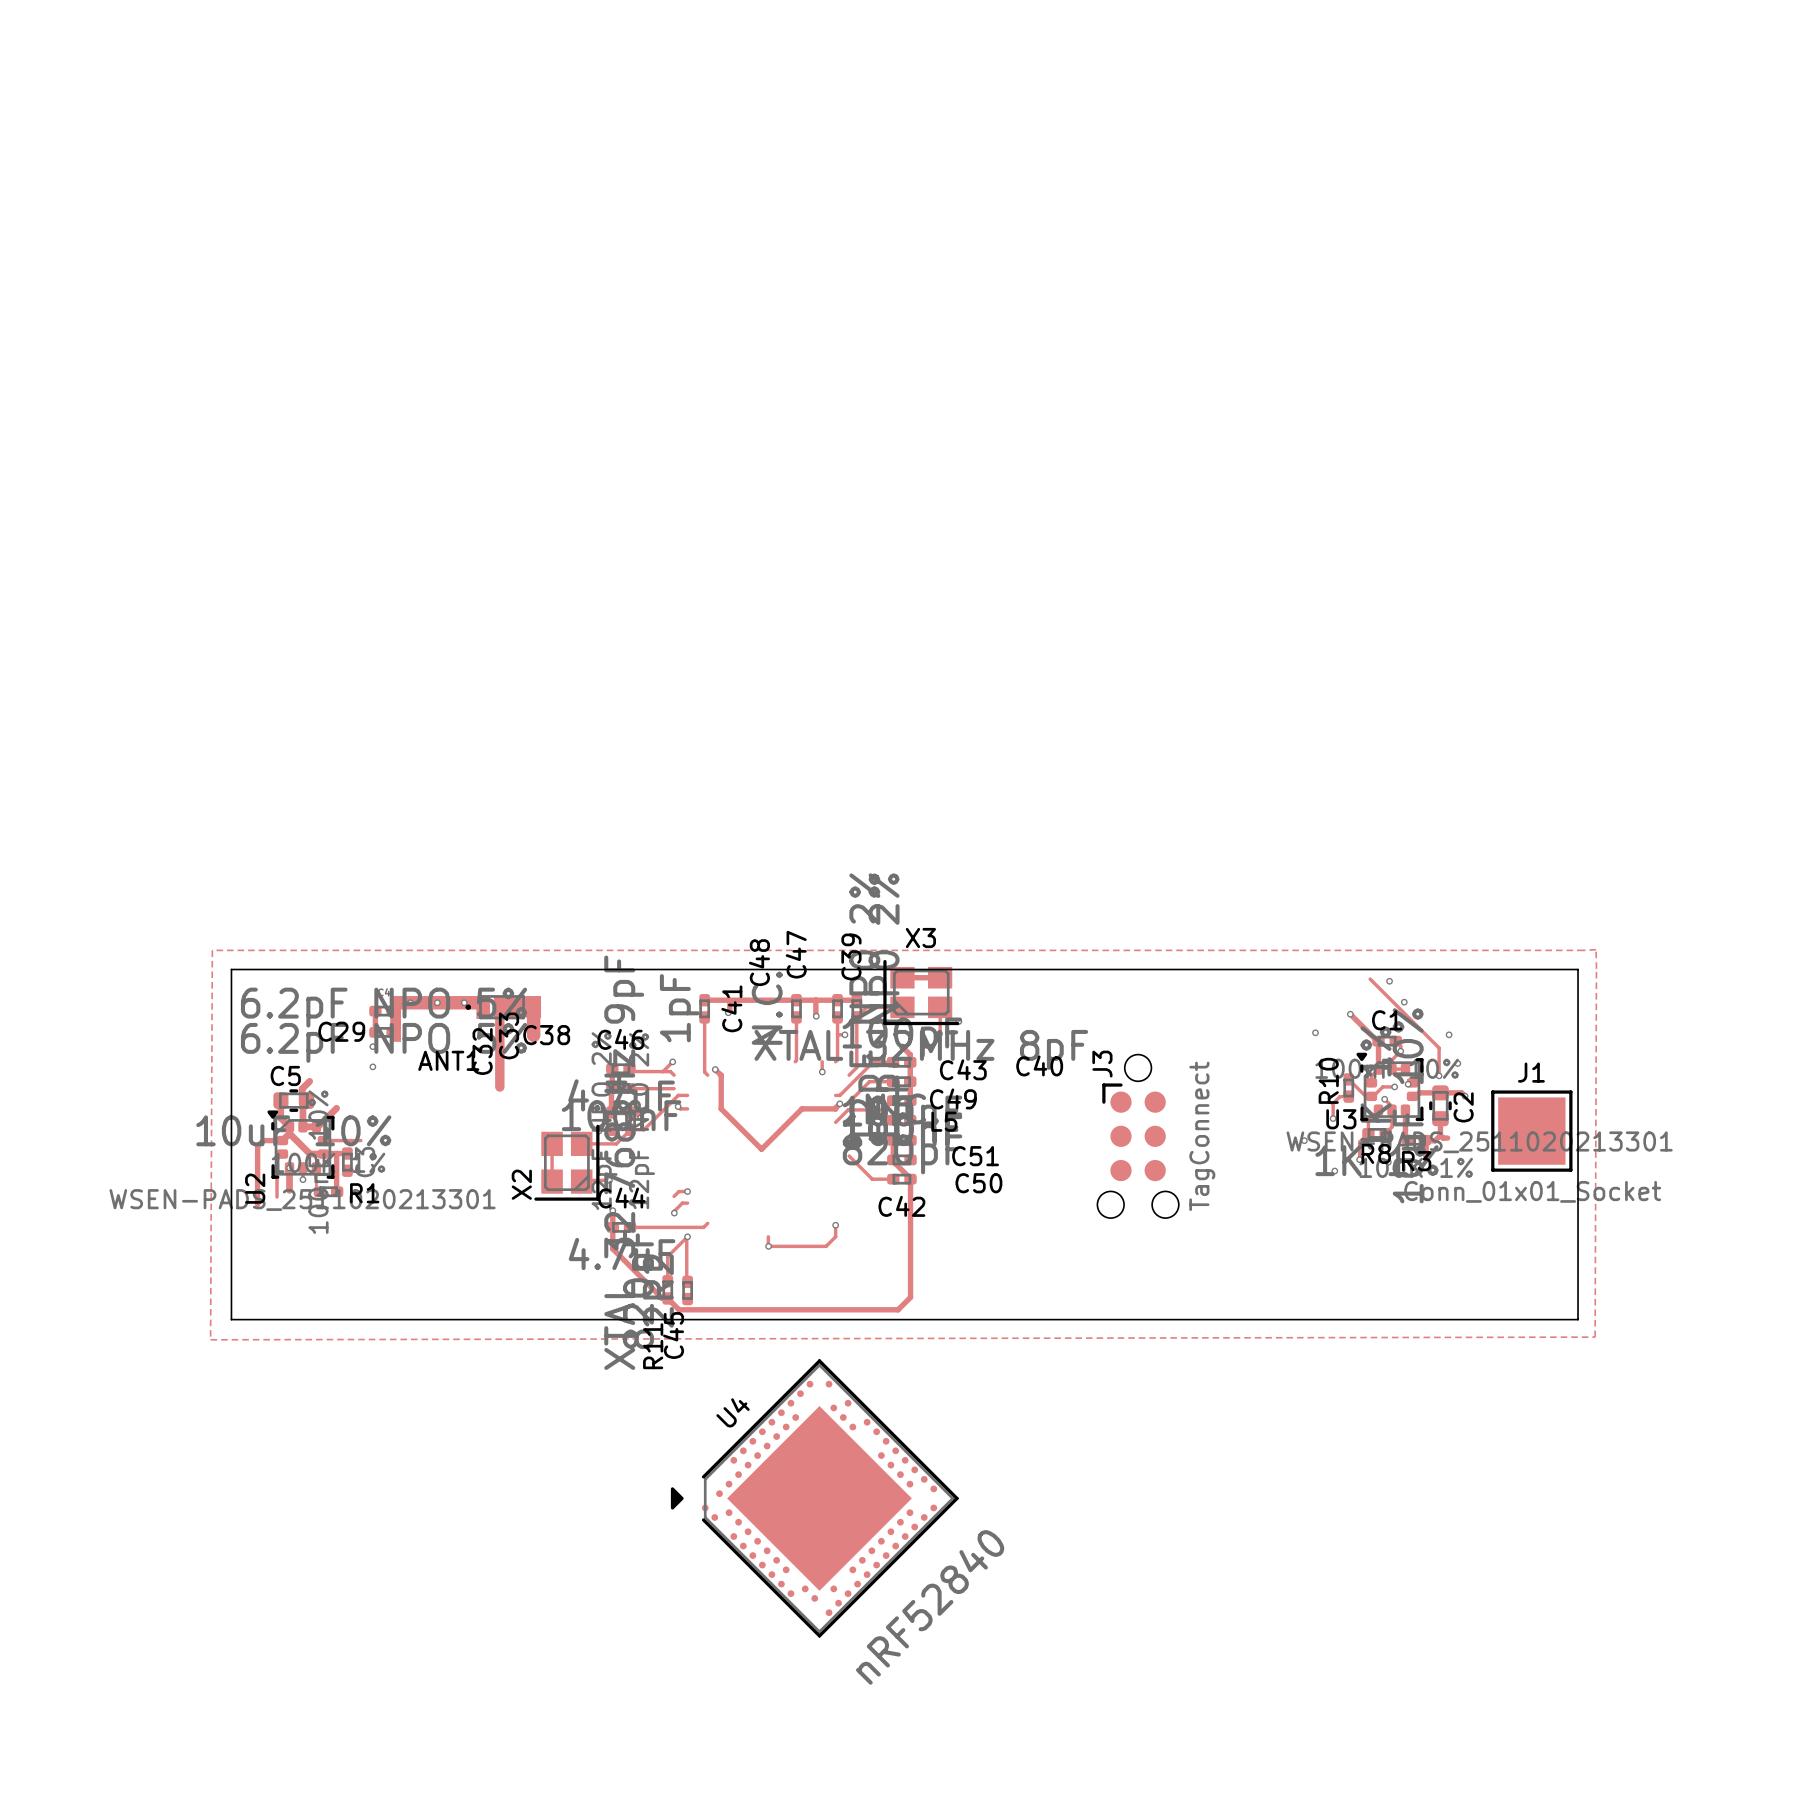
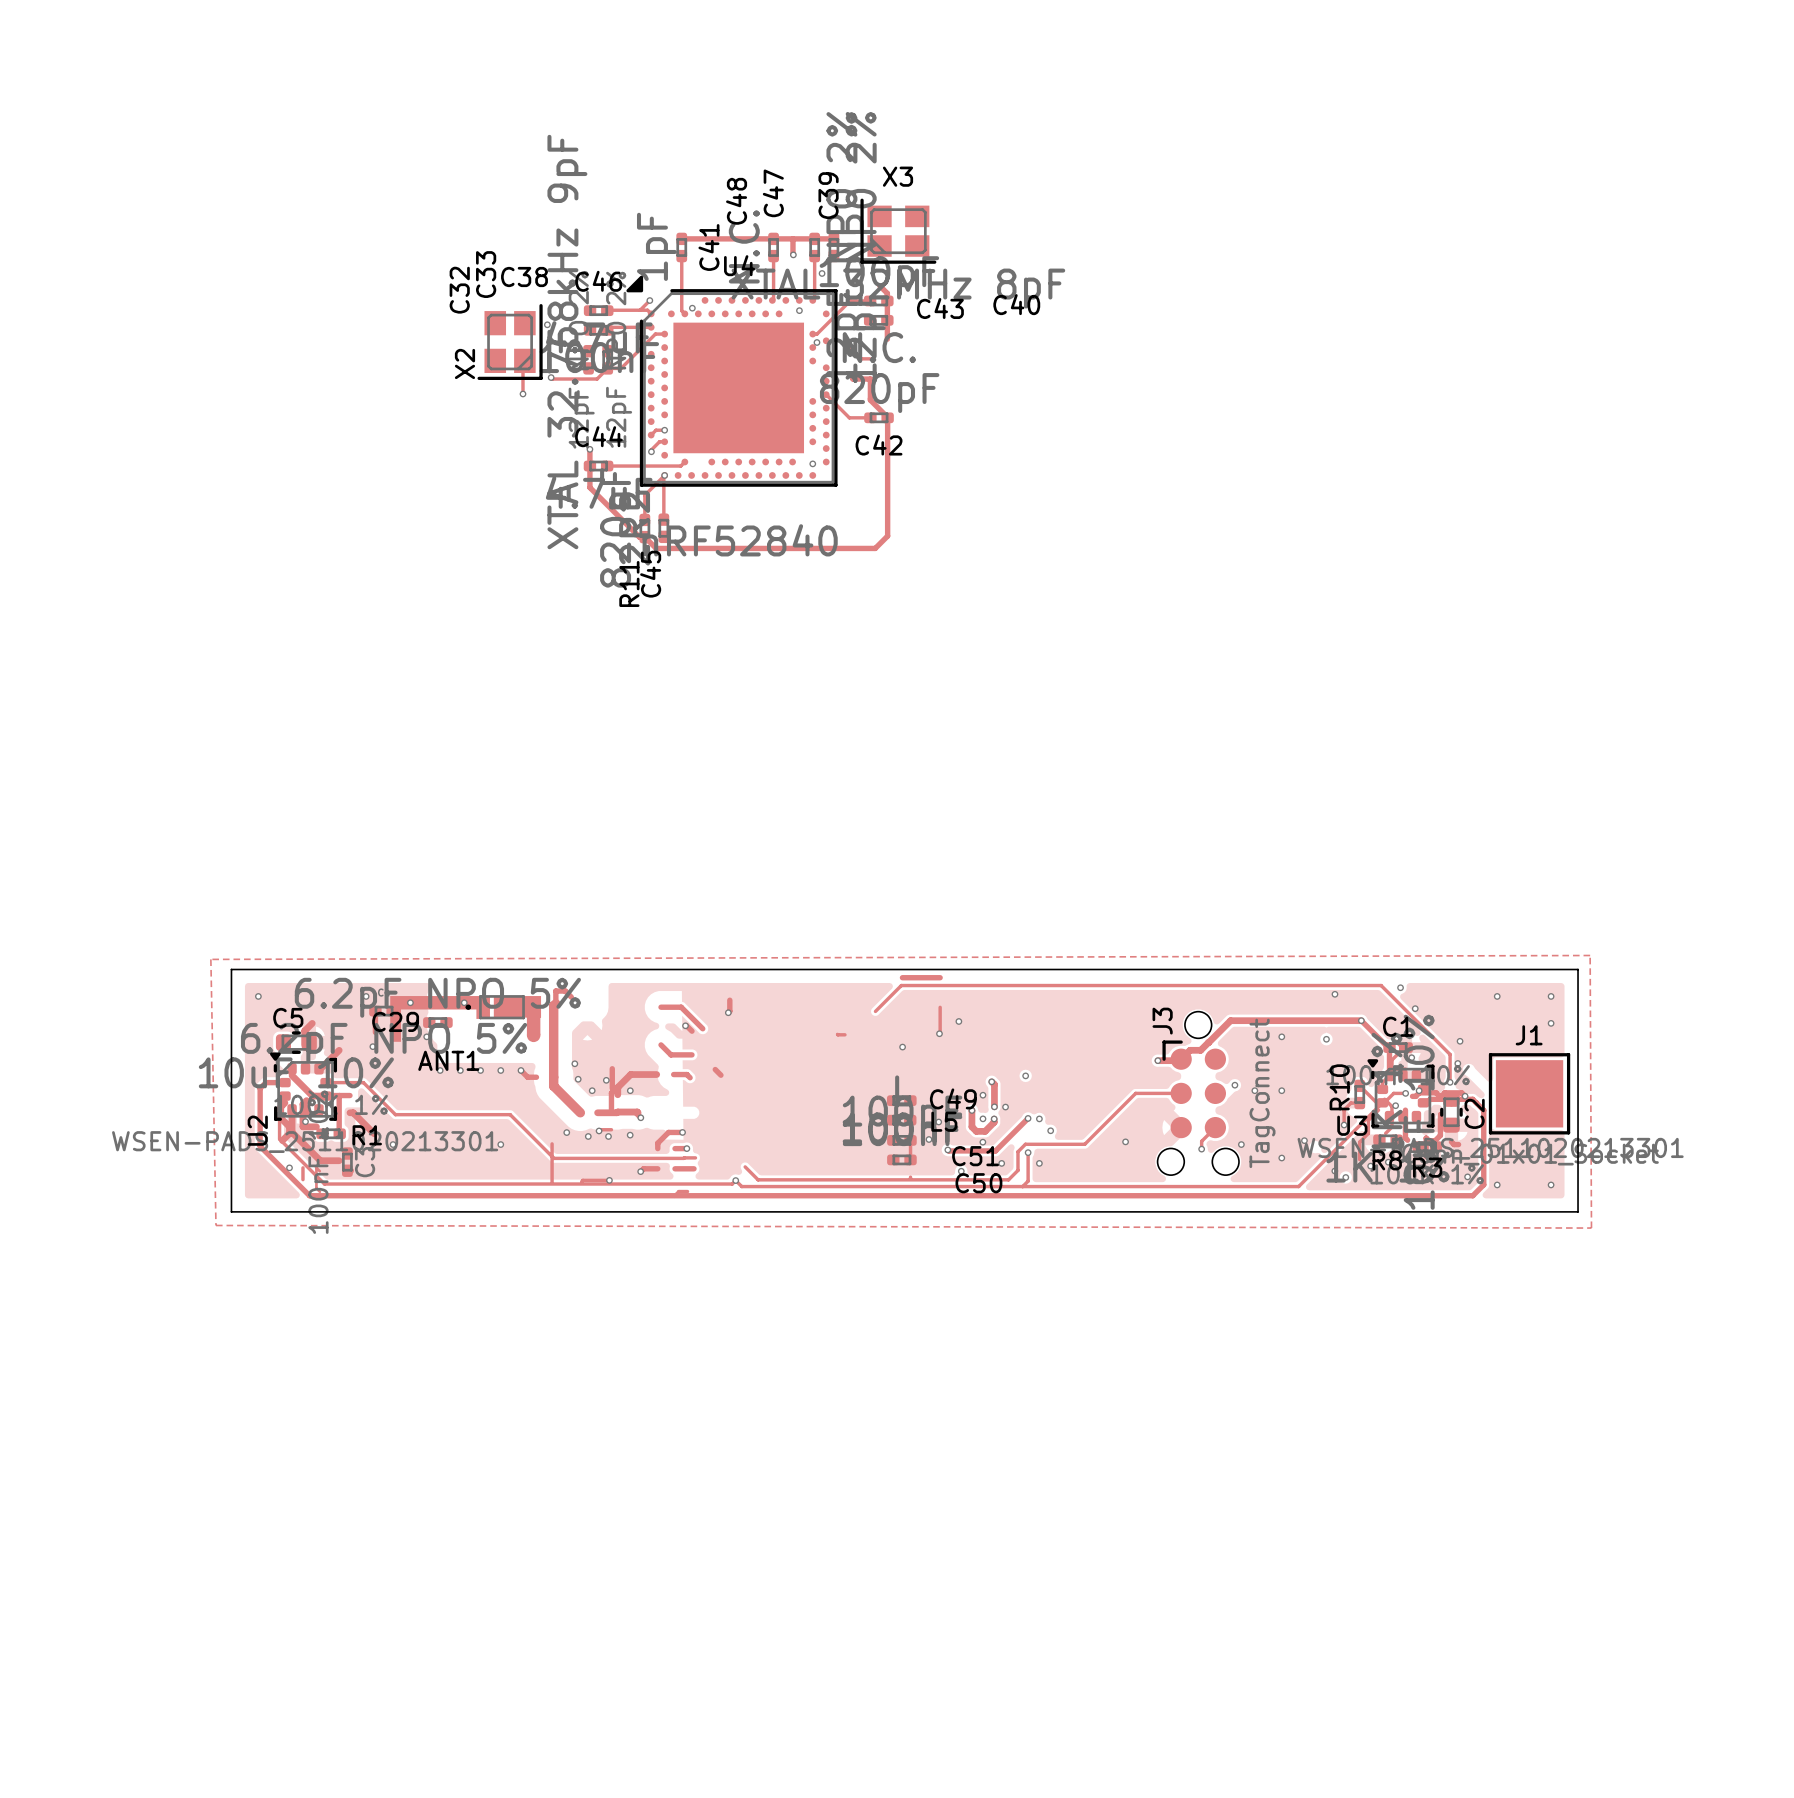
track: none -> (681, 238) (833, 238)
track: none -> (792, 238) (793, 254)
via: none -> (793, 254)
track: none -> (681, 256) (681, 310) (684, 313)
track: none -> (773, 256) (772, 300)
track: none -> (814, 256) (814, 298) (812, 300)
via: none -> (822, 273)
track: none -> (879, 285) (887, 293) (887, 339)
track: none -> (649, 300) (640, 310)
via: none -> (649, 300)
track: none -> (870, 300) (850, 300) (817, 334) (812, 334)
via: none -> (692, 308)
track: none -> (607, 310) (647, 310) (651, 313)
via: none -> (799, 310)
via: none -> (547, 324)
track: none -> (651, 327) (610, 327) (607, 330)
track: none -> (664, 334) (655, 334) (621, 368) (607, 368) (597, 379) (551, 377)
via: none -> (816, 342)
track: none -> (851, 348) (861, 358) (870, 358)
track: none -> (522, 370) (522, 393)
via: none -> (551, 377)
track: none -> (852, 378) (870, 379) (870, 400) (887, 417) (887, 536) (875, 548) (656, 548) (644, 537) (639, 537) (589, 487) (589, 449)
via: none -> (522, 393)
track: none -> (826, 394) (849, 417) (870, 417)
track: none -> (664, 430) (656, 430) (651, 435)
via: none -> (664, 430)
track: none -> (664, 441) (659, 441) (651, 451)
via: none -> (589, 449)
via: none -> (651, 451)
track: none -> (684, 461) (680, 466) (607, 466)
via: none -> (812, 463)
track: none -> (664, 475) (644, 495) (644, 519)
via: none -> (664, 475)
track: none -> (663, 476) (663, 519)
zone outline: (1596, 949) (1595, 1337) (210, 1339) (212, 950) (1596, 949) -> (1590, 955) (210, 959) (215, 1225) (1591, 1228) (1590, 955)
track: (1370, 979) (1439, 1048) (1439, 1075) -> none
via: (1389, 981) -> none
via: none -> (1400, 987)
X3 position: (921, 992) -> (898, 231)
via: none -> (1334, 994)
via: none -> (258, 996)
via: none -> (366, 996)
via: none -> (1497, 996)
via: none -> (1551, 996)
track: none -> (571, 997) (565, 991) (555, 991) (555, 1003) (553, 1005) (553, 1086) (580, 1112)
track: (704, 1000) (856, 1000) -> none
track: (815, 1000) (816, 1016) -> none
via: (437, 1002) -> none
via: (1404, 1002) -> none
track: (517, 1006) (511, 1000) (501, 1000) (501, 1013) (499, 1015) (499, 1087) -> none
track: none -> (661, 1007) (681, 1007) (702, 1028)
track: (902, 1007) (866, 1007) (856, 1017) (856, 1067) (849, 1075) -> none
C41 position: (704, 1008) -> (681, 247)
C39 position: (796, 1008) -> (773, 247)
C48 position: (837, 1008) -> (814, 247)
C47 position: (856, 1008) -> (833, 247)
via: none -> (1415, 1008)
track: none -> (875, 1011) (901, 985) (1381, 985) (1450, 1054) (1450, 1082)
track: (1350, 1014) (1378, 1041) (1378, 1069) (1371, 1076) (1371, 1082) -> none
via: (1350, 1014) -> none
via: (816, 1016) -> none
track: (704, 1017) (704, 1072) (707, 1075) -> none
track: (796, 1017) (795, 1061) -> none
track: (837, 1017) (837, 1059) (835, 1061) -> none
via: none -> (1361, 1020)
via: none -> (1551, 1023)
track: none -> (685, 1025) (691, 1031)
via: none -> (685, 1025)
C29 position: (384, 1032) -> (437, 1022)
via position: (1315, 1032) -> (1326, 1039)
via: (844, 1034) -> none
via position: (1449, 1034) -> (1460, 1041)
via: none -> (426, 1036)
via: none -> (1281, 1036)
C1 position: (1387, 1041) -> (1398, 1047)
track: none -> (1208, 1042) (1200, 1050) (1190, 1050) (1179, 1060) (1157, 1060)
track: none -> (1208, 1042) (1230, 1020) (1361, 1020) (1389, 1047) (1389, 1075) (1382, 1082) (1382, 1089)
track: none -> (661, 1044) (670, 1054) (691, 1054)
track: (902, 1047) (910, 1054) (910, 1100) -> none
via position: (1400, 1051) -> (1411, 1057)
via: none -> (1157, 1060)
track: (672, 1061) (663, 1071) -> none
via: (672, 1061) -> none
track: (822, 1061) (822, 1071) -> none
track: (893, 1062) (873, 1062) (839, 1095) (835, 1095) -> none
C40 position: (901, 1062) -> (878, 300)
via: none -> (574, 1063)
via: (372, 1066) -> none
C46 position: (620, 1068) -> (598, 310)
via: (715, 1069) -> none
via: none -> (440, 1070)
via: none -> (460, 1070)
via: none -> (480, 1070)
via: none -> (500, 1070)
track: none -> (520, 1070) (527, 1077) (536, 1077)
via: none -> (520, 1070)
track: (630, 1071) (670, 1071) (674, 1075) -> (690, 1077) (686, 1074) (673, 1074)
via: (822, 1071) -> none
track: none -> (656, 1074) (630, 1074) (617, 1087) (617, 1094)
track: (721, 1075) (721, 1108) (761, 1149) (802, 1108) (835, 1108) (839, 1103) -> none
via: none -> (1025, 1075)
via: (1439, 1075) -> none
track: none -> (281, 1079) (284, 1082) (265, 1082) (260, 1088) (260, 1146) (309, 1195) (1472, 1195) (1483, 1184) (1483, 1110) (1472, 1099) (1455, 1099) (1451, 1103) (1447, 1099) (1430, 1099) (1426, 1102) (1423, 1102)
via: none -> (578, 1079)
track: (1348, 1079) (1365, 1096) (1373, 1096) (1382, 1086) (1394, 1086) -> (1359, 1085) (1376, 1102) (1384, 1102) (1393, 1093) (1405, 1093)
via: none -> (606, 1080)
track: (309, 1081) (302, 1088) (302, 1102) -> (312, 1023) (304, 1030) (304, 1044)
track: (893, 1081) (869, 1081) (849, 1102) -> none
C43 position: (901, 1081) -> (878, 320)
track: none -> (991, 1081) (994, 1084) (994, 1106)
via: none -> (991, 1081)
track: none -> (326, 1082) (363, 1082) (395, 1114) (510, 1114) (553, 1158) (695, 1157)
via: none -> (1450, 1082)
via: (1408, 1084) -> none
via: none -> (1234, 1085)
U3 position: (1389, 1086) -> (1400, 1093)
via: (1394, 1086) -> none
C38 position: (620, 1088) -> (598, 330)
track: (674, 1088) (633, 1088) (630, 1091) -> none
R10 position: (1348, 1088) -> (1359, 1094)
via: none -> (592, 1090)
via: none -> (630, 1090)
via: none -> (1254, 1090)
via: none -> (1281, 1090)
via: none -> (1419, 1090)
track: none -> (1181, 1093) (1135, 1093) (1084, 1144) (1025, 1144) (1017, 1151) (1017, 1170) (1008, 1179) (758, 1179) (745, 1166)
via: none -> (1405, 1093)
track: (687, 1095) (678, 1095) (643, 1129) (630, 1129) (616, 1143) (581, 1143) -> none
via: none -> (982, 1095)
track: none -> (284, 1096) (279, 1101) (279, 1139) (324, 1184) (732, 1184) (735, 1180) (741, 1186) (1298, 1186) (1382, 1102)
track: (1348, 1096) (1340, 1096) (1333, 1103) -> (1359, 1103) (1350, 1103) (1343, 1110)
via: (1384, 1099) -> none
C5 position: (293, 1100) -> (296, 1042)
track: (893, 1100) (883, 1109) (848, 1109) (835, 1122) -> none
via: (839, 1103) -> none
track: (1333, 1103) (1333, 1118) -> (1344, 1110) (1344, 1125)
via: none -> (1395, 1105)
C2 position: (1440, 1105) -> (1451, 1112)
track: (678, 1106) (680, 1108) (687, 1108) -> none
via: (678, 1106) -> none
via: none -> (994, 1106)
via: none -> (1005, 1107)
track: (336, 1108) (318, 1126) -> (339, 1050) (320, 1068)
track: none -> (292, 1109) (292, 1132) (320, 1160) (339, 1160)
track: none -> (971, 1110) (971, 1126) (976, 1131) (985, 1131) (994, 1122) (994, 1118)
via: none -> (971, 1110)
track: none -> (349, 1112) (353, 1112) (374, 1133)
track: none -> (597, 1112) (638, 1112)
via: none -> (982, 1118)
via: none -> (994, 1118)
track: none -> (1028, 1118) (995, 1150) (947, 1149)
via: none -> (1028, 1118)
via: none -> (1039, 1118)
via position: (1333, 1118) -> (1344, 1125)
via: none -> (305, 1121)
C32 position: (611, 1121) -> (588, 359)
C33 position: (630, 1121) -> (607, 359)
via: none -> (938, 1122)
track: none -> (1215, 1127) (1201, 1141) (1201, 1149)
via: none -> (1050, 1130)
J1 position: (1531, 1131) -> (1529, 1093)
via: none -> (566, 1132)
track: none -> (682, 1132) (668, 1132) (657, 1143) (657, 1148)
via: none -> (682, 1132)
track: (289, 1133) (310, 1154) (347, 1153) -> (292, 1075) (312, 1096) (349, 1095)
R8 position: (1377, 1133) -> (1388, 1139)
via: none -> (630, 1135)
track: (1440, 1135) (1443, 1138) (1447, 1138) -> (1451, 1141) (1454, 1144) (1458, 1144)
via: none -> (588, 1136)
via: none -> (608, 1136)
J3 position: (1138, 1136) -> (1198, 1093)
track: (279, 1137) (282, 1140) (263, 1140) (257, 1146) (257, 1204) -> none
track: (875, 1139) (893, 1140) (893, 1161) (910, 1178) (910, 1297) (898, 1309) (679, 1309) (667, 1298) (662, 1298) (612, 1248) (612, 1210) -> none
via: none -> (928, 1139)
track: (323, 1140) (360, 1140) -> none
R3 position: (1416, 1140) -> (1427, 1146)
via: none -> (1125, 1141)
via: none -> (982, 1142)
U2 position: (300, 1144) -> (303, 1086)
via: none -> (393, 1144)
via: none -> (500, 1144)
via: none -> (1241, 1144)
track: none -> (675, 1148) (686, 1148)
via: none -> (686, 1148)
via: none -> (947, 1149)
via: none -> (1201, 1149)
track: none -> (1028, 1152) (1028, 1181) (1022, 1186)
via: none -> (1028, 1152)
track: (336, 1153) (337, 1191) -> (339, 1095) (339, 1133)
track: (282, 1154) (277, 1159) (277, 1197) -> none
track: (849, 1156) (872, 1179) (893, 1179) -> none
via: none -> (1281, 1158)
via: (1359, 1159) -> none
X2 position: (566, 1162) -> (510, 342)
via: none -> (1001, 1163)
via: none -> (1039, 1163)
via: none -> (1370, 1166)
track: (289, 1167) (289, 1190) -> none
track: none -> (657, 1168) (643, 1168) (640, 1171)
track: none -> (675, 1168) (694, 1168)
via: none -> (640, 1171)
via: none -> (961, 1171)
via: none -> (1467, 1176)
via: none -> (1345, 1177)
via: (302, 1179) -> none
C42 position: (901, 1179) -> (879, 417)
via: none -> (735, 1180)
via: none -> (1497, 1184)
via: none -> (1551, 1184)
R1 position: (328, 1191) -> (331, 1133)
via: (687, 1191) -> none
track: (687, 1203) (682, 1203) (674, 1213) -> none
via: (612, 1210) -> none
board edge: (231, 1211) (231, 1319) (1578, 1319) (1578, 1211) -> (231, 1211) (1578, 1211)
via: (674, 1213) -> none
track: (707, 1223) (703, 1227) (630, 1227) -> none
track: (835, 1225) (835, 1236) (826, 1246) (768, 1246) -> none
via: (835, 1225) -> none
C44 position: (621, 1227) -> (598, 466)
track: (687, 1236) (667, 1256) (667, 1281) -> none
via: (687, 1236) -> none
track: (768, 1236) (768, 1246) -> none
track: (686, 1237) (686, 1280) -> none
via: (768, 1246) -> none
C45 position: (667, 1289) -> (644, 528)
R11 position: (687, 1290) -> (663, 528)
U4 rotation: 0° (814, 1498) -> 45° clockwise (731, 381)
U4 position: (814, 1498) -> (731, 381)

